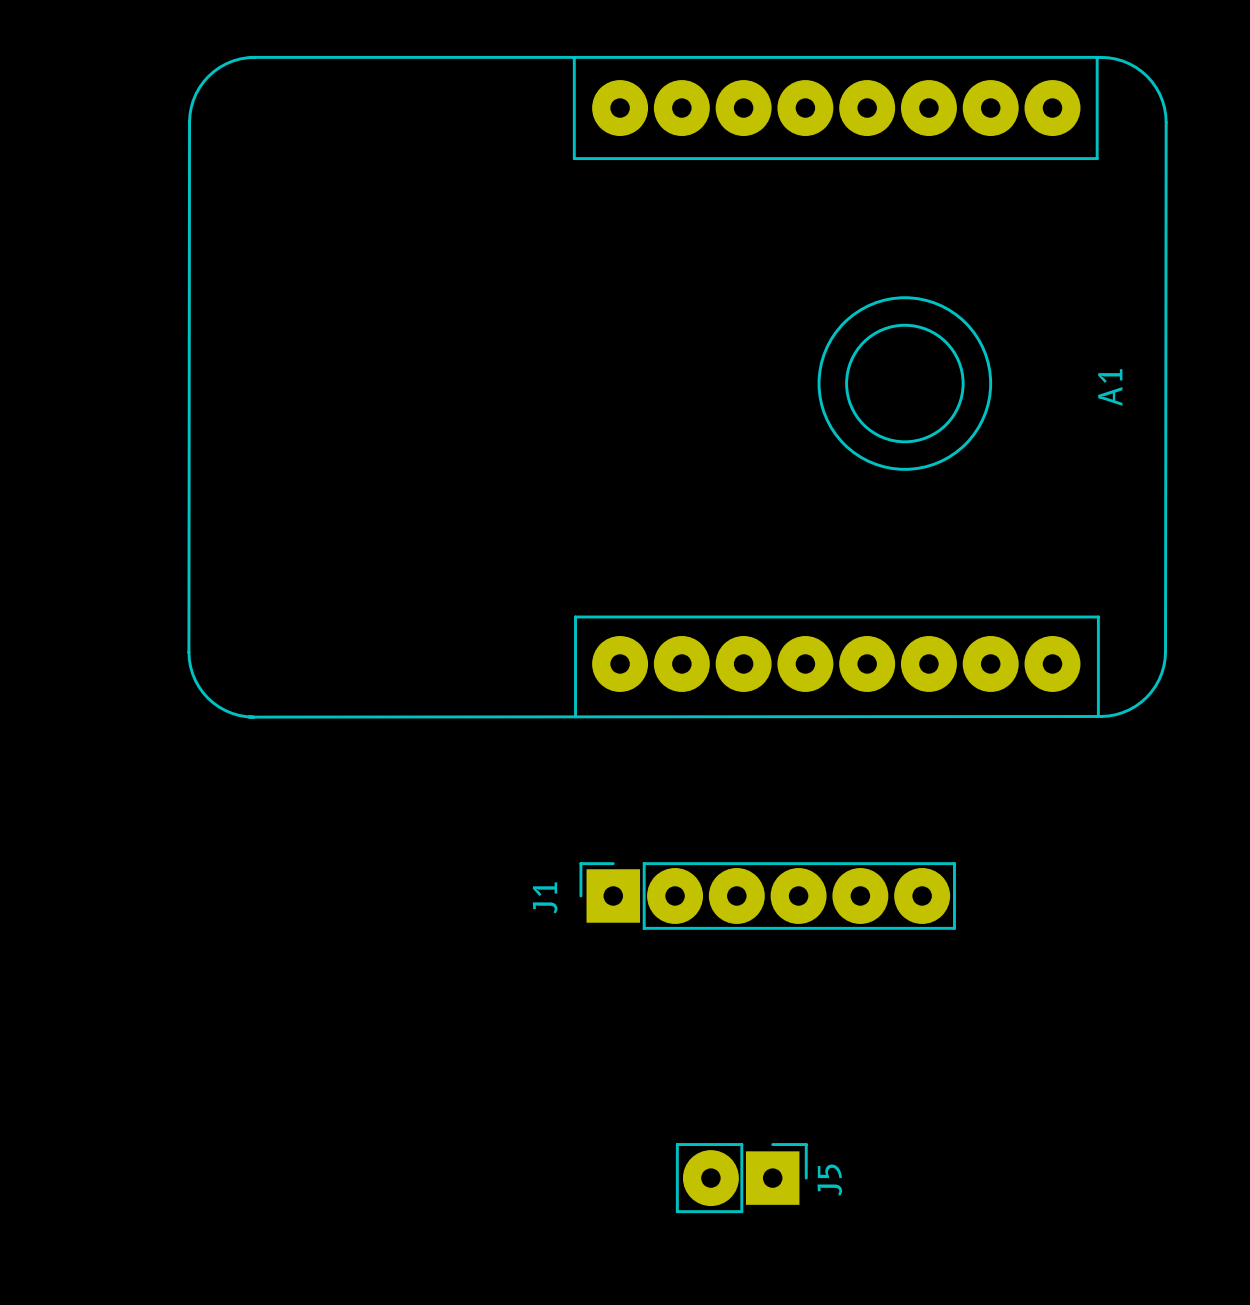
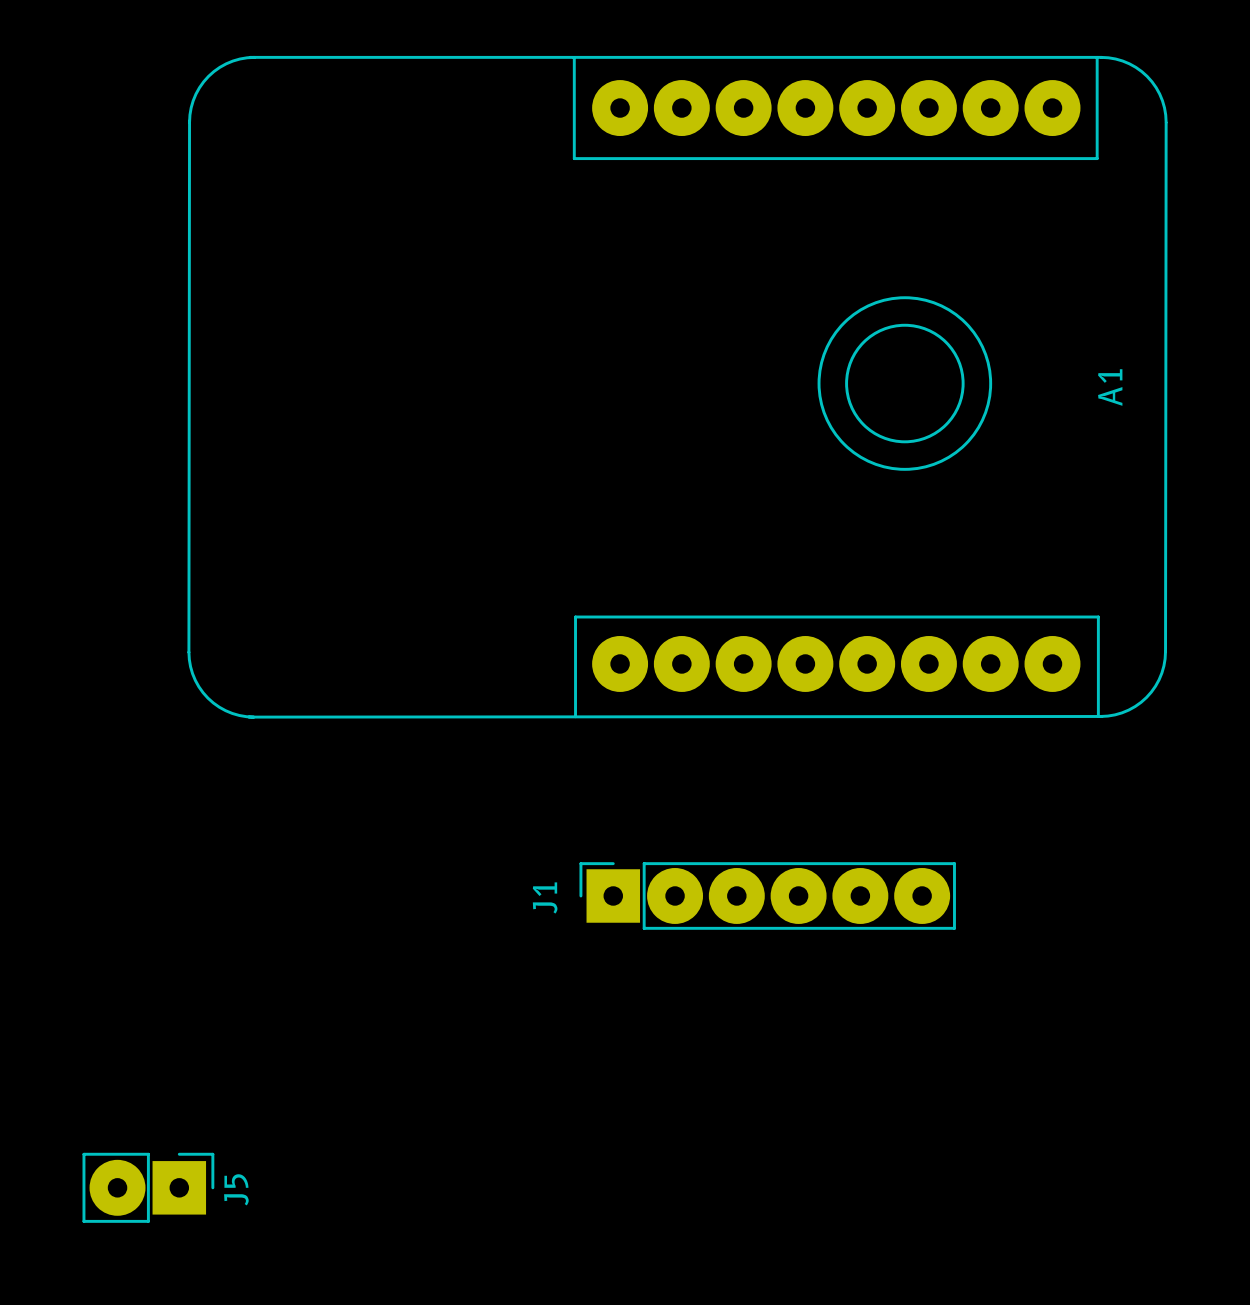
J5 position: (741, 1178) -> (148, 1187)

